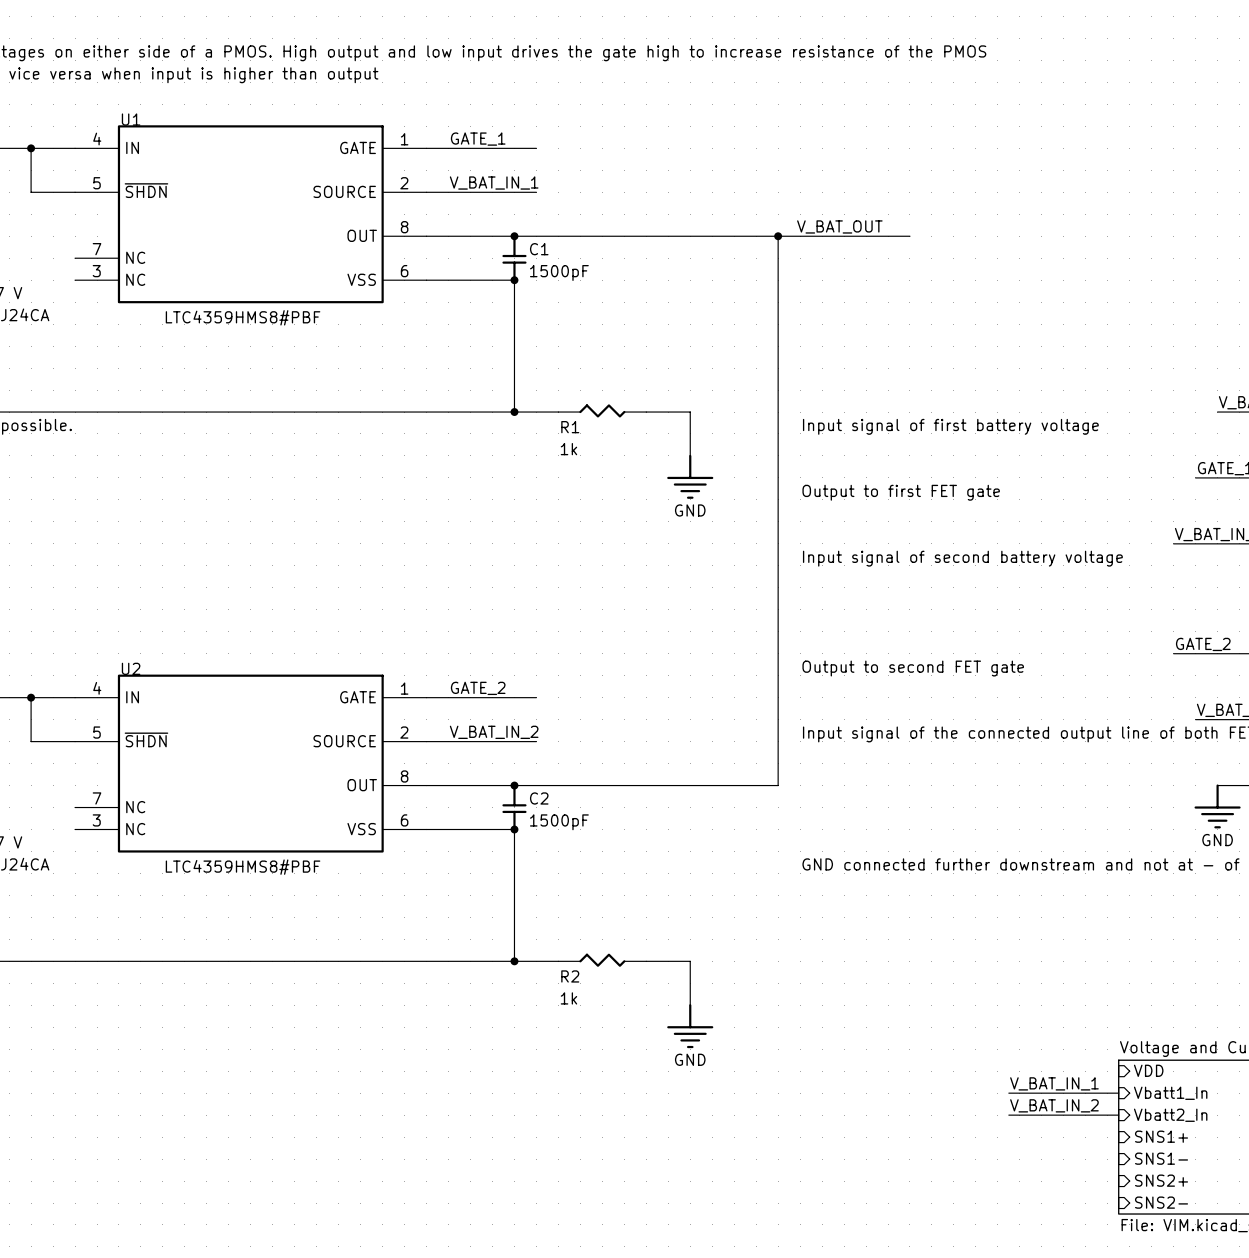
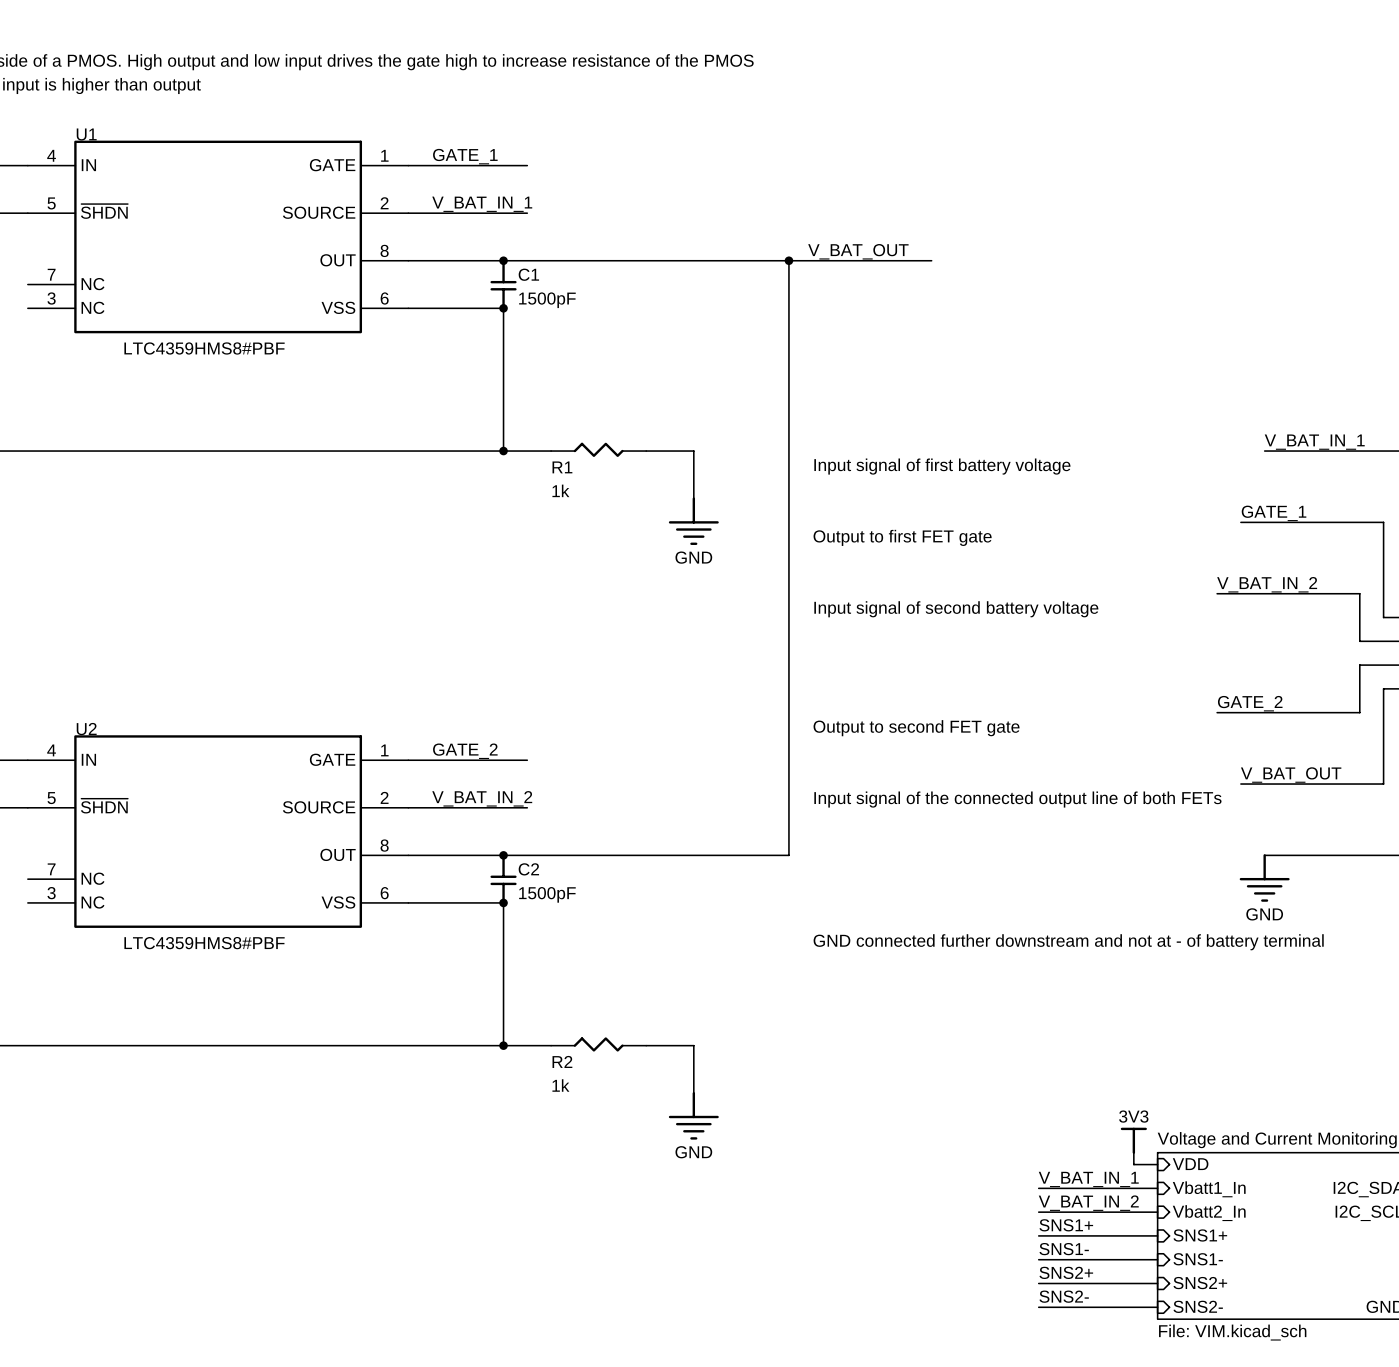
power symbol: none -> 3V3 (1133, 1140)
wire: none -> (1133, 1152) (1133, 1164) (1157, 1164)
label: none -> SNS1+ (1066, 1225)
wire: none -> (1038, 1235) (1157, 1235)
label: none -> SNS1- (1064, 1249)
wire: none -> (1038, 1259) (1157, 1259)
label: none -> SNS2+ (1066, 1272)
wire: none -> (1038, 1283) (1157, 1283)
label: none -> SNS2- (1064, 1296)
wire: none -> (1038, 1307) (1157, 1307)

